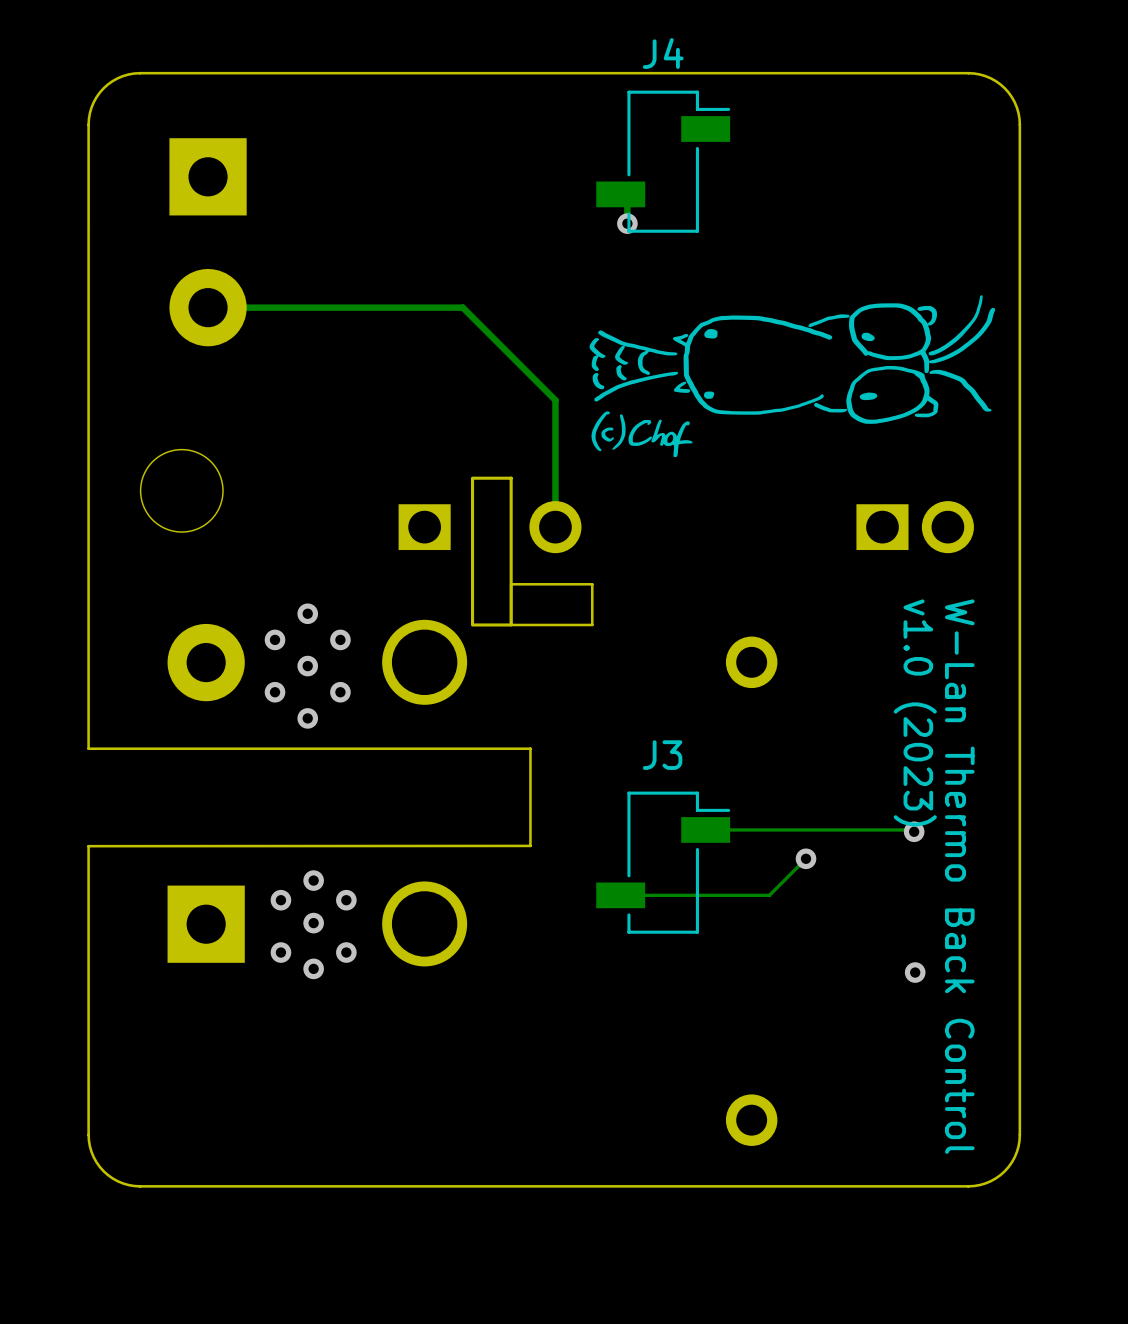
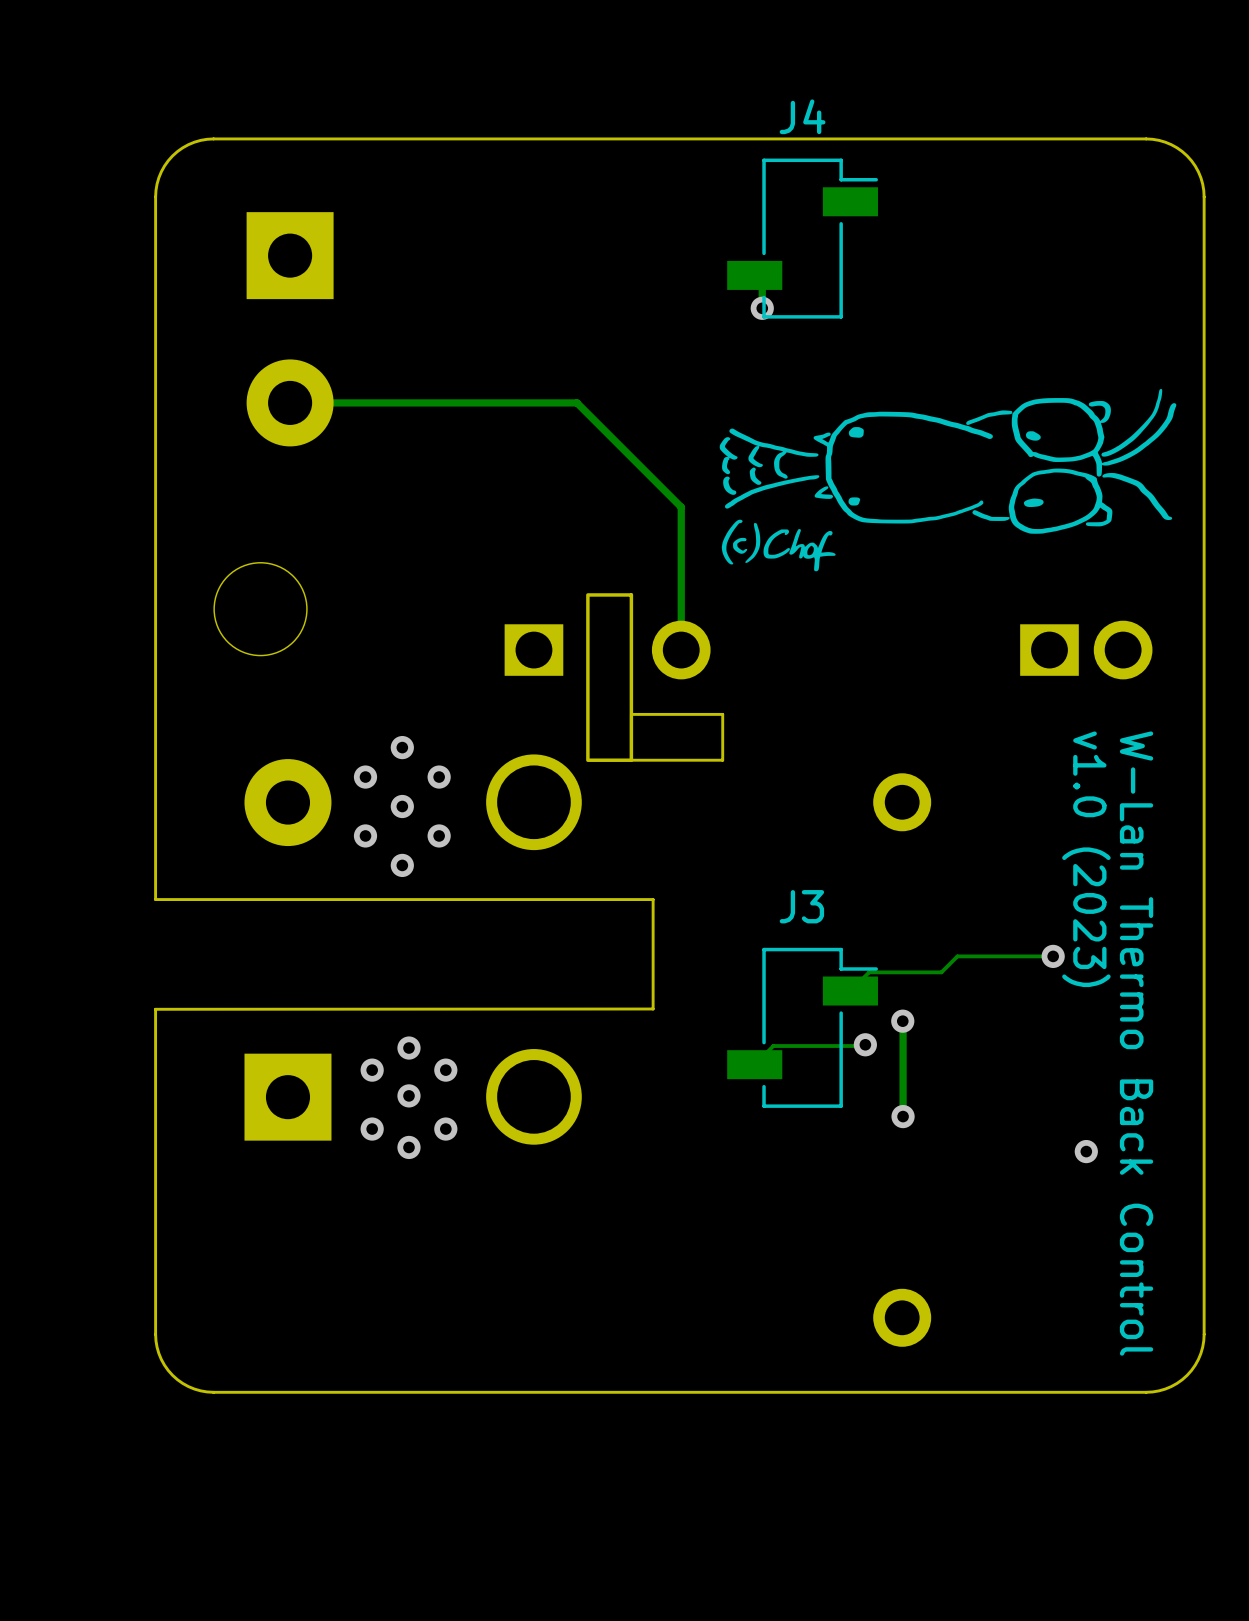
track: (705, 829) (912, 829) (914, 831) -> (850, 991) (869, 972) (941, 972) (957, 956) (1053, 956)
via position: (914, 831) -> (1053, 956)
track: none -> (903, 1021) (903, 1116)
via: none -> (902, 1021)
track: (806, 858) (769, 895) (620, 895) -> (865, 1044) (773, 1046) (754, 1064)
via: (806, 858) -> none
via: none -> (865, 1044)
via: none -> (903, 1116)

